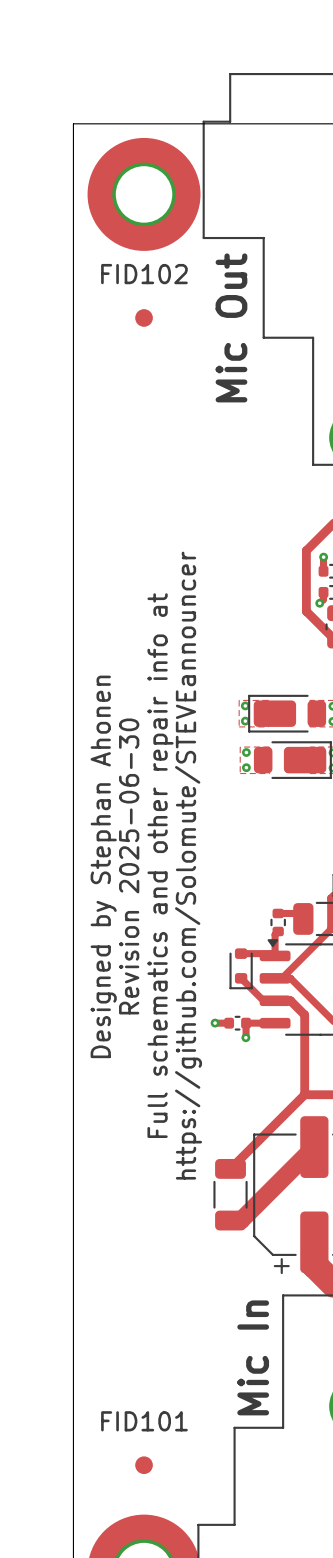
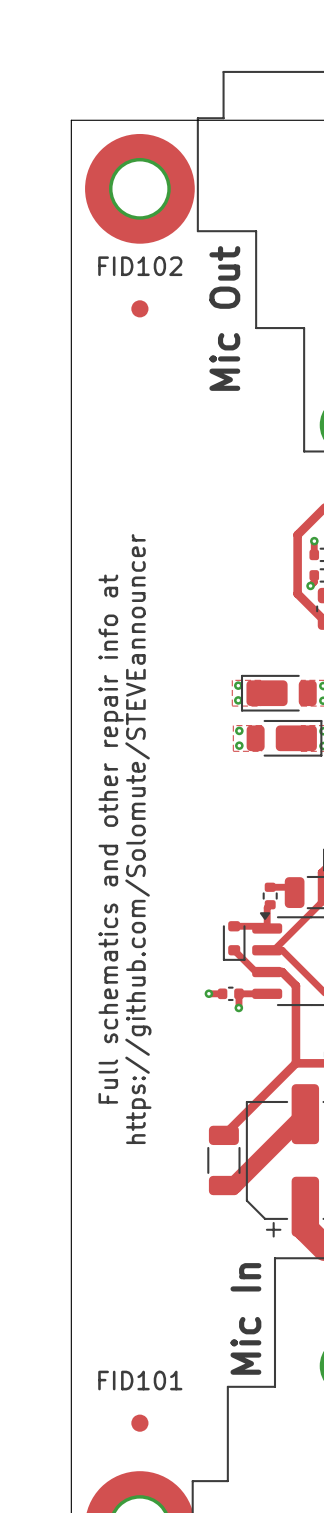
text position: Full schematics and other repair info at (160, 865) -> Full schematics and other repair info at (111, 839)
text position: https://github.com/Solomute/STEVEannouncer (188, 865) -> https://github.com/Solomute/STEVEannouncer (138, 839)
text: Designed by Stephan Ahonen (103, 866) -> none
text: Revision 2025-06-30 (129, 866) -> none

